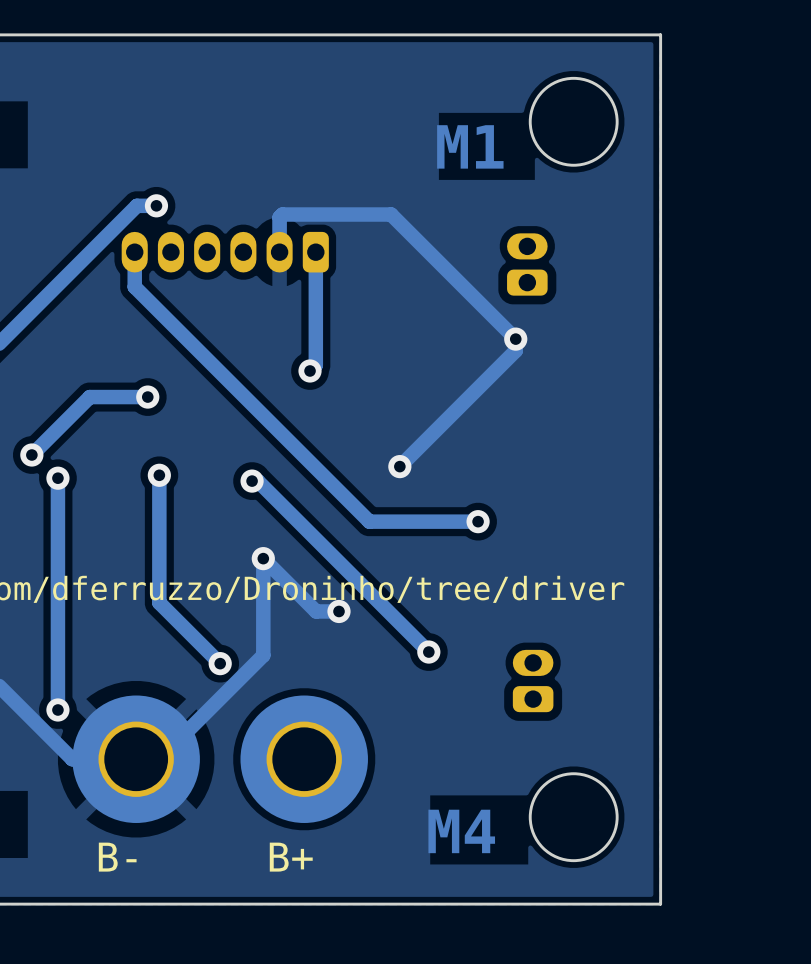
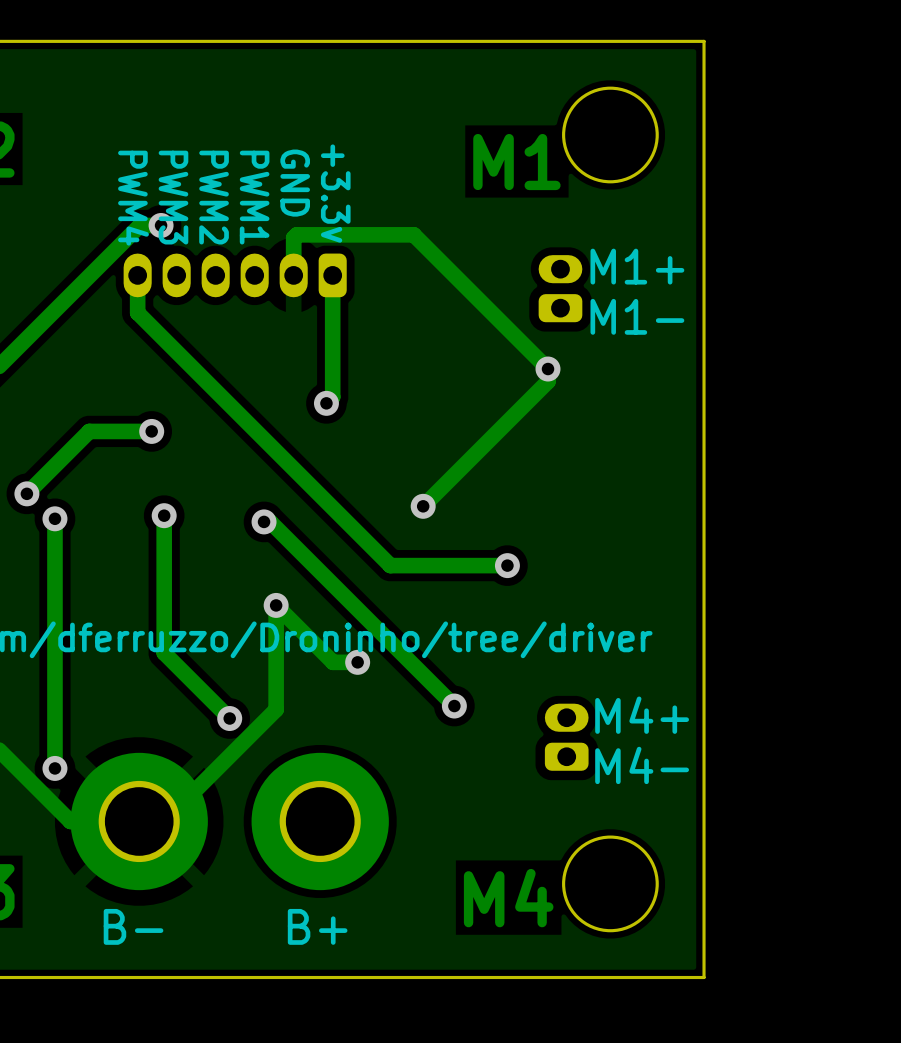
text: none -> GND (295, 183)
text: none -> PWM3 (173, 197)
text: none -> PWM2 (214, 197)
text: none -> PWM1 (254, 197)
text: none -> PWM4 (133, 198)
text: none -> +3.3v (335, 193)
text: none -> M1+ (637, 266)
text: none -> M1- (637, 316)
text: none -> M4+ (642, 715)
text: none -> M4- (642, 765)

